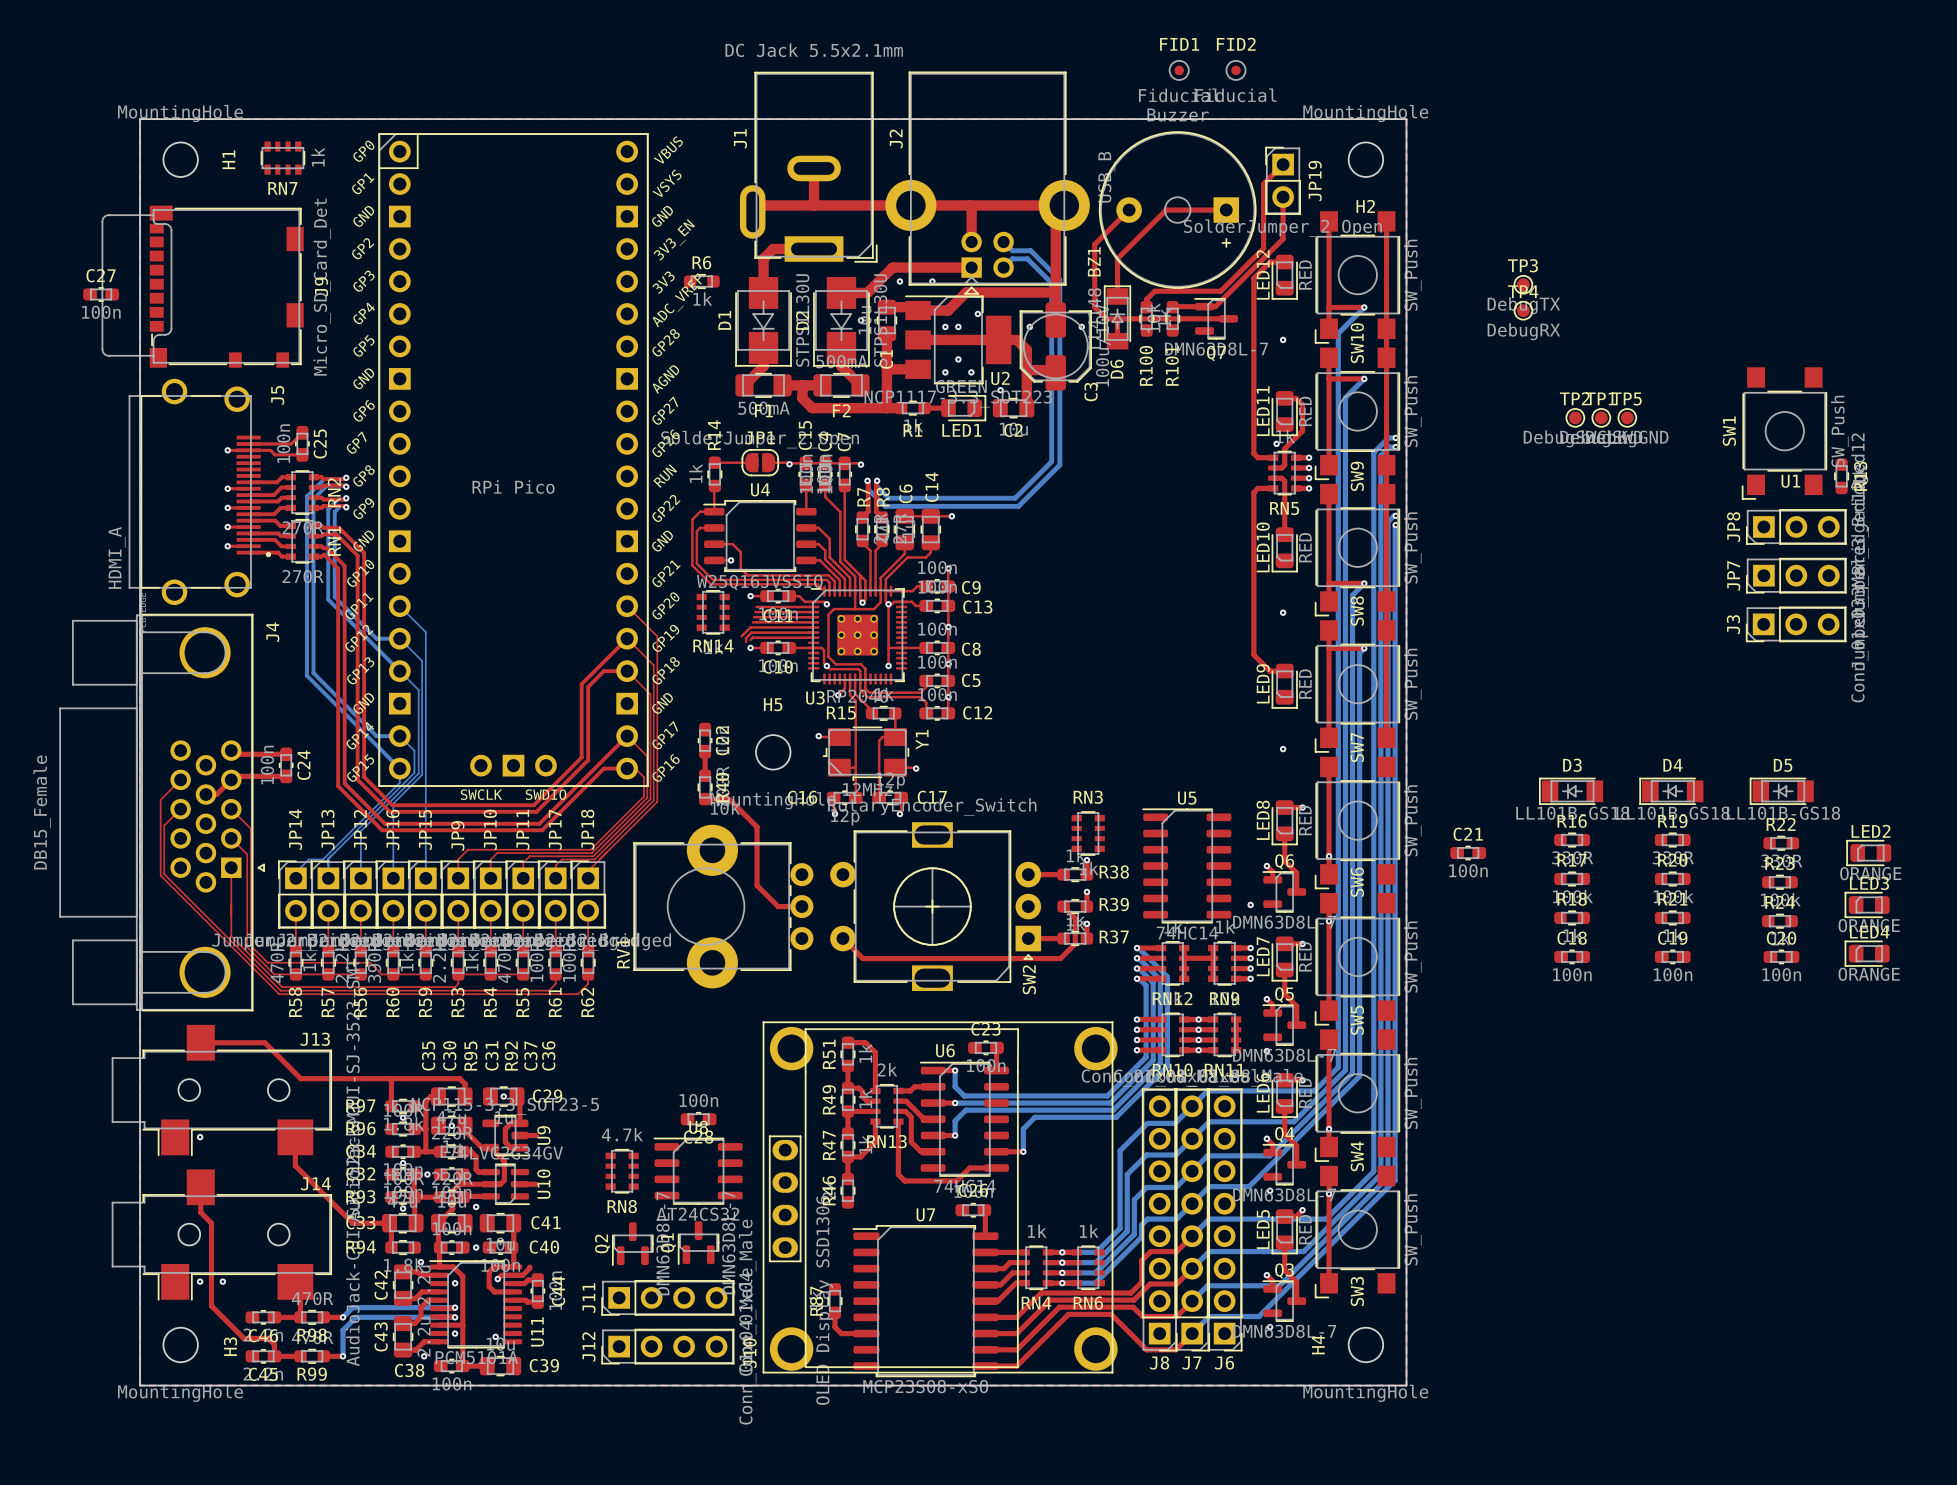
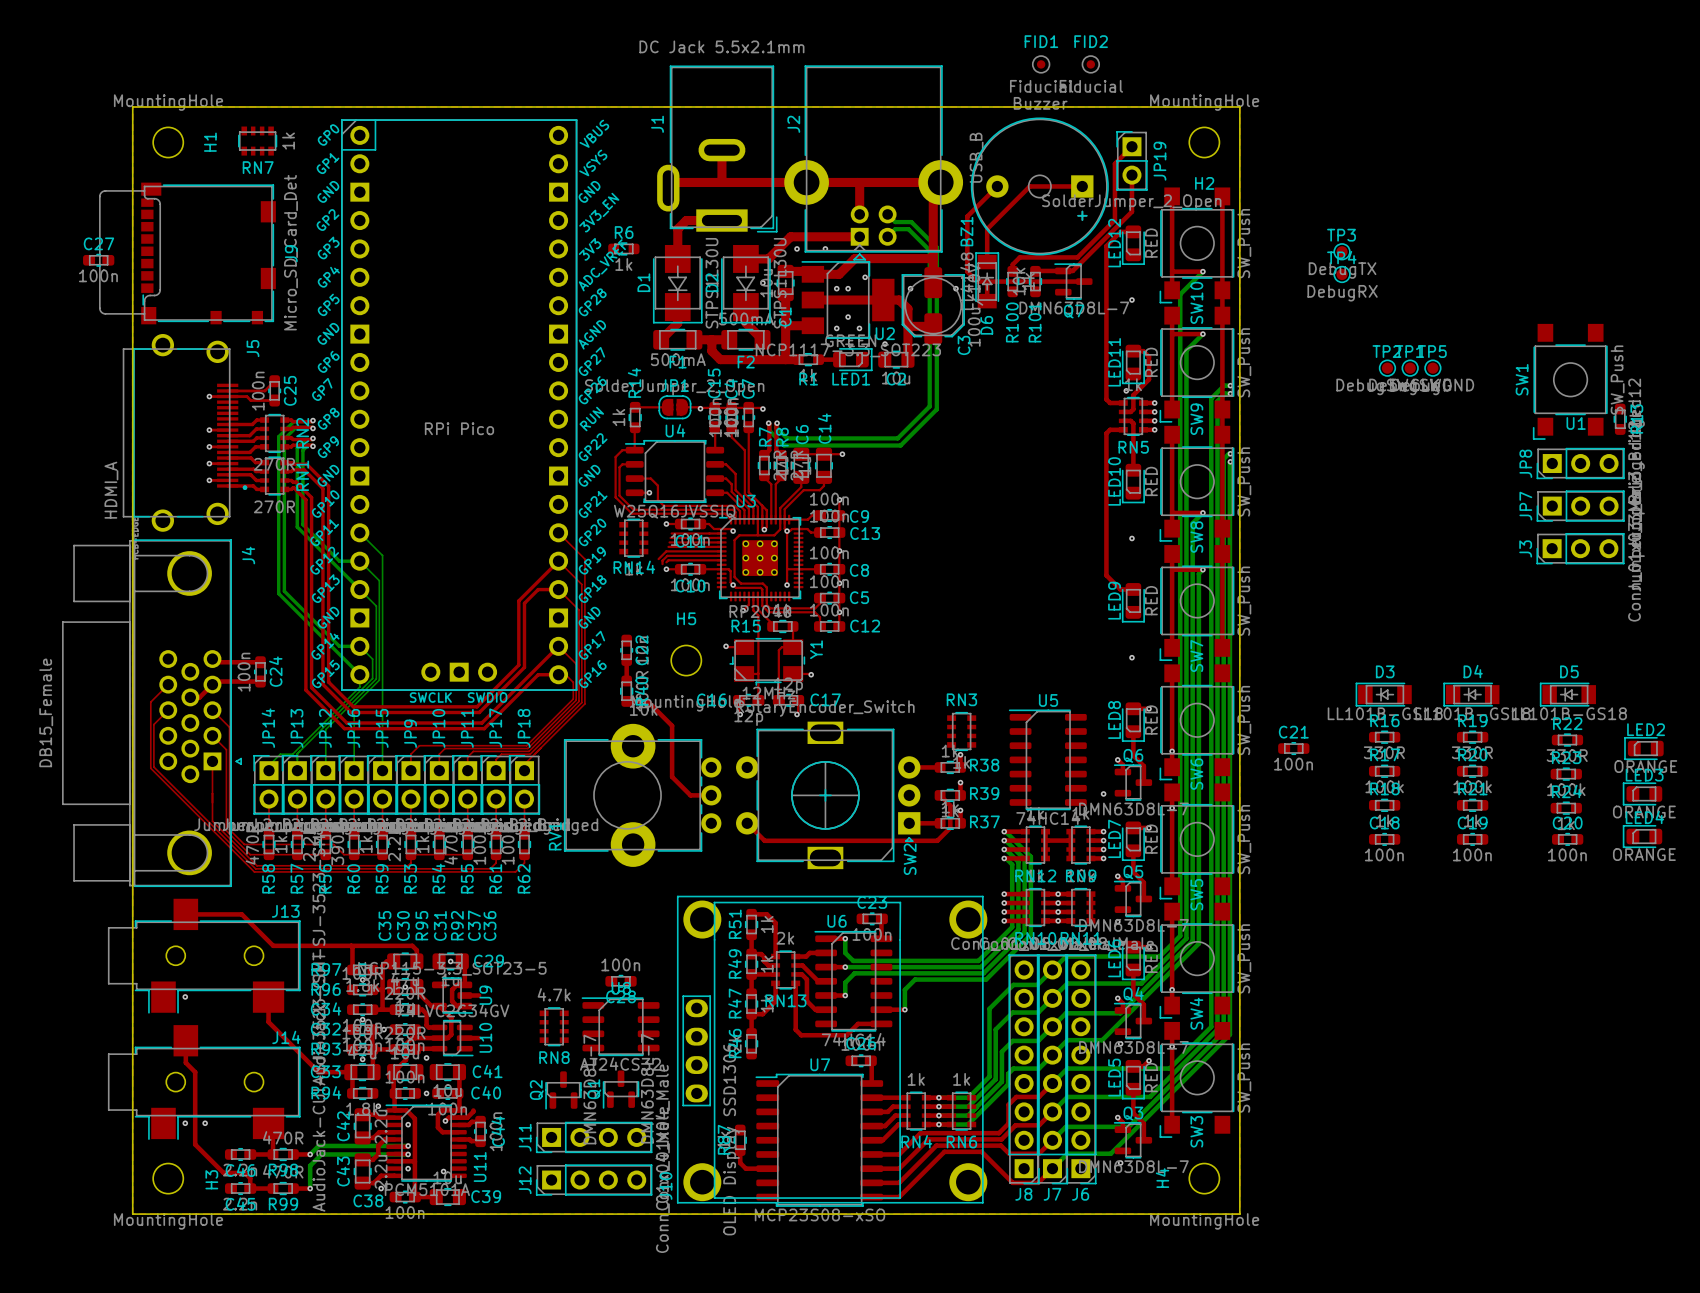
U3 name position: U3 (815, 697) -> U3 (746, 501)

